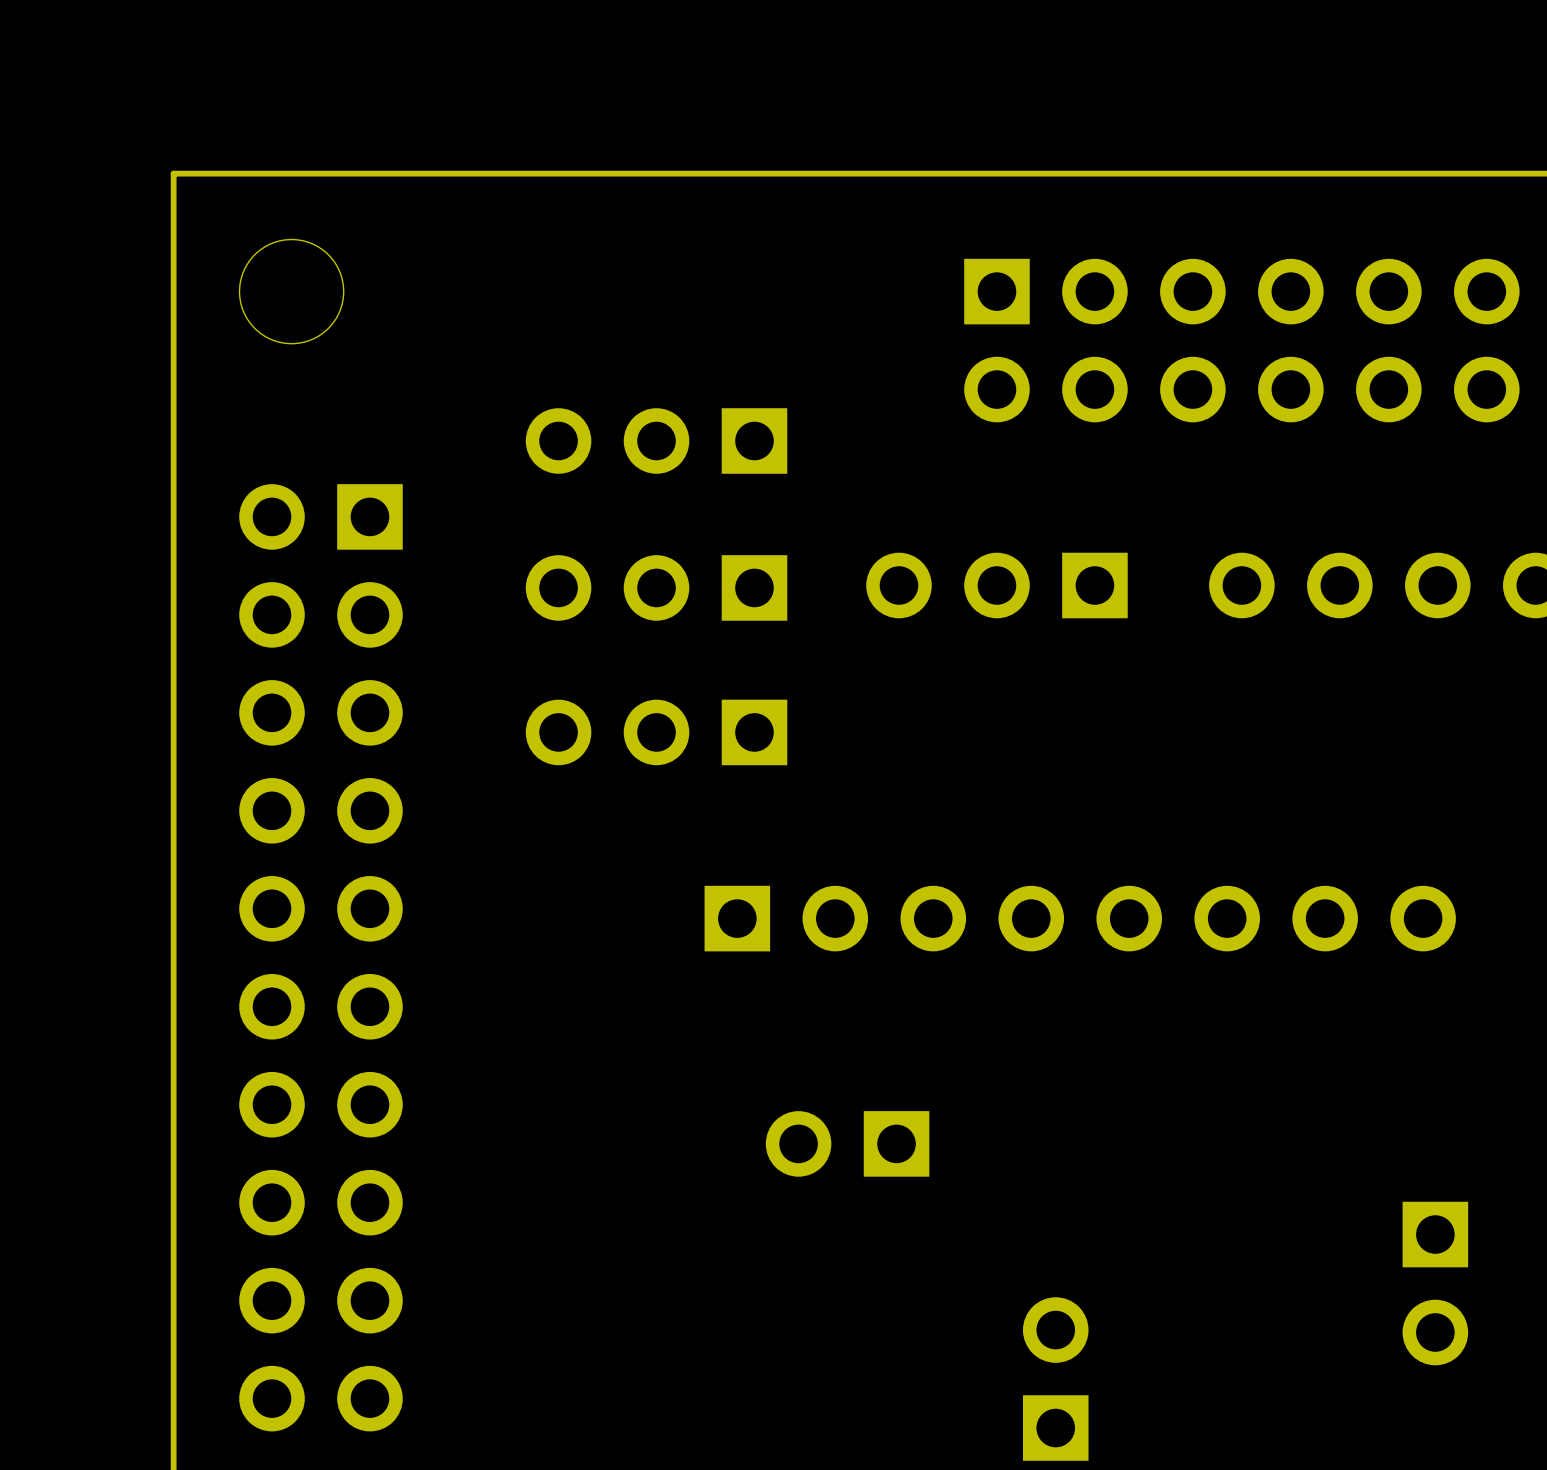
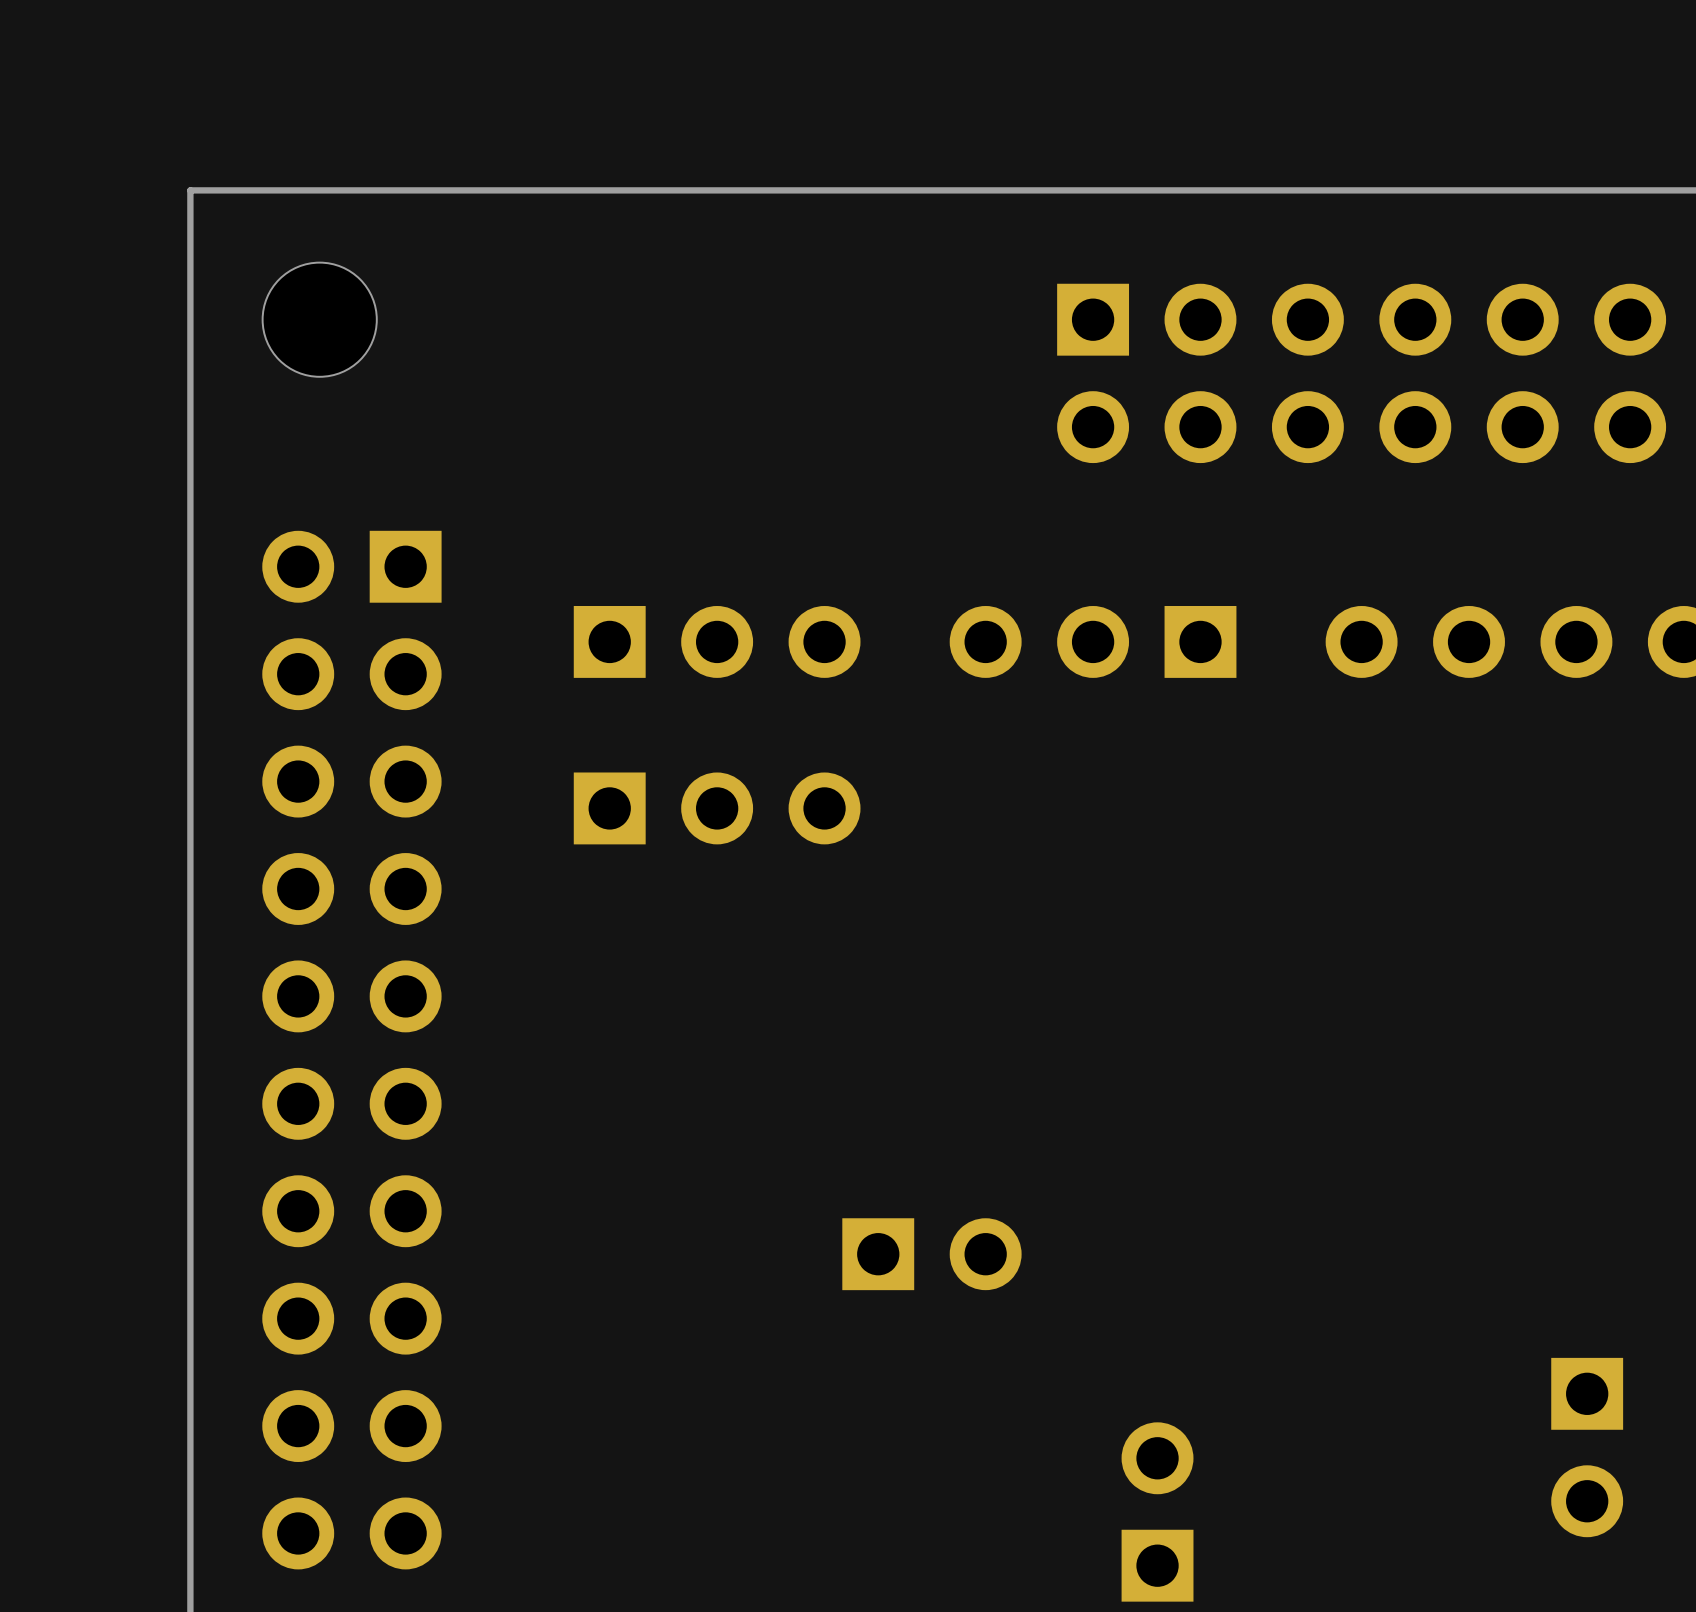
part: (656, 441) -> none
part rotation: 0° (656, 587) -> 180° (717, 641)
part rotation: 0° (656, 732) -> 180° (717, 808)
part: (1080, 918) -> none
part rotation: 0° (847, 1143) -> 180° (931, 1254)
part position: (1435, 1283) -> (1587, 1447)

